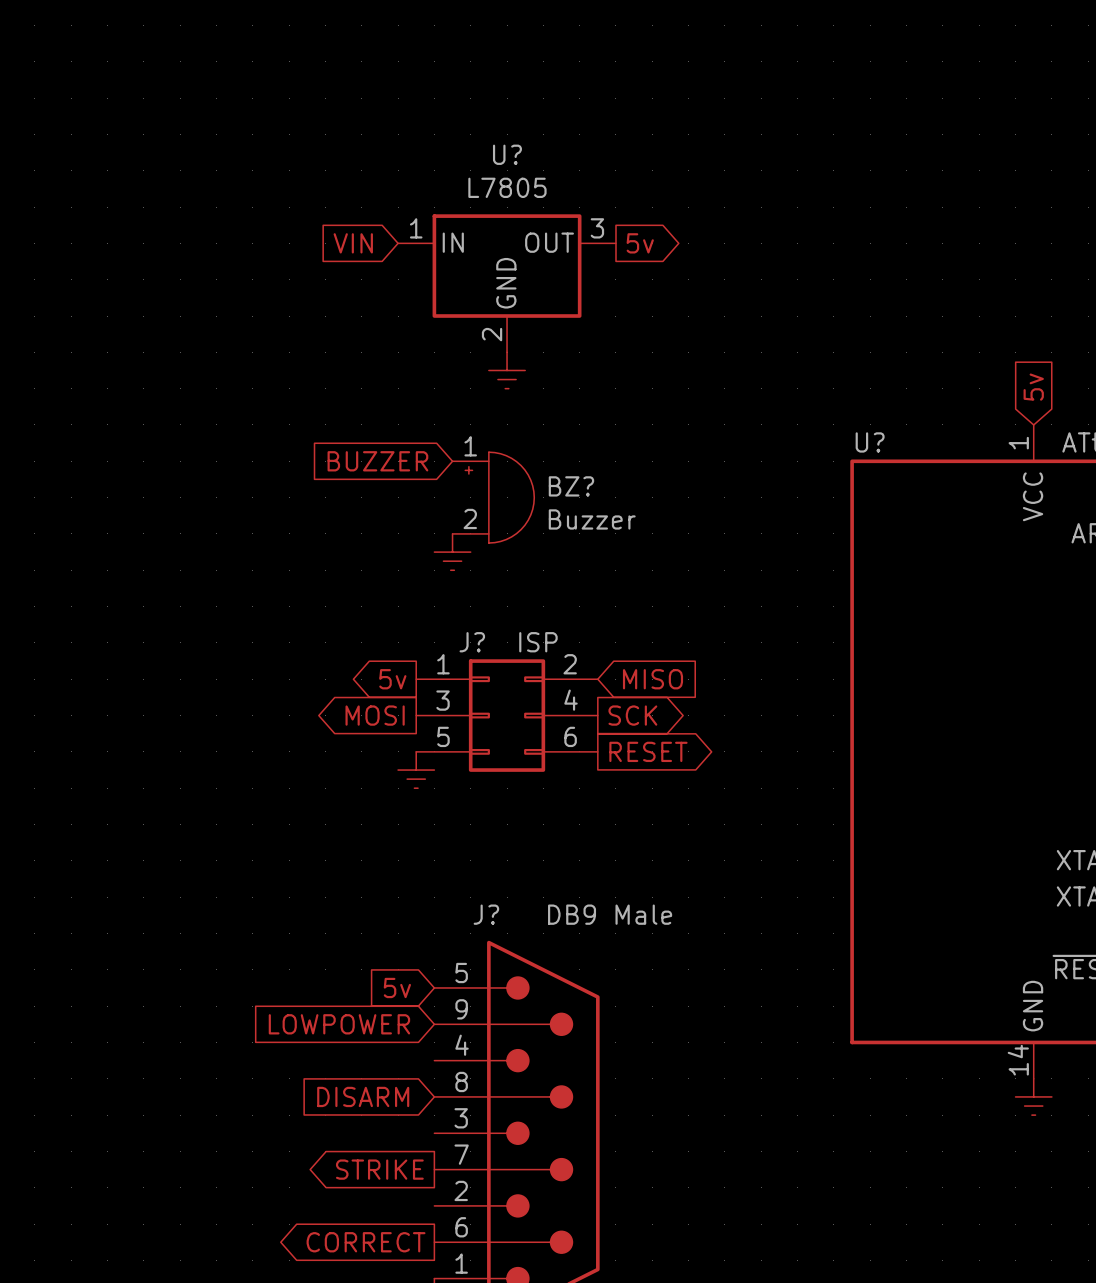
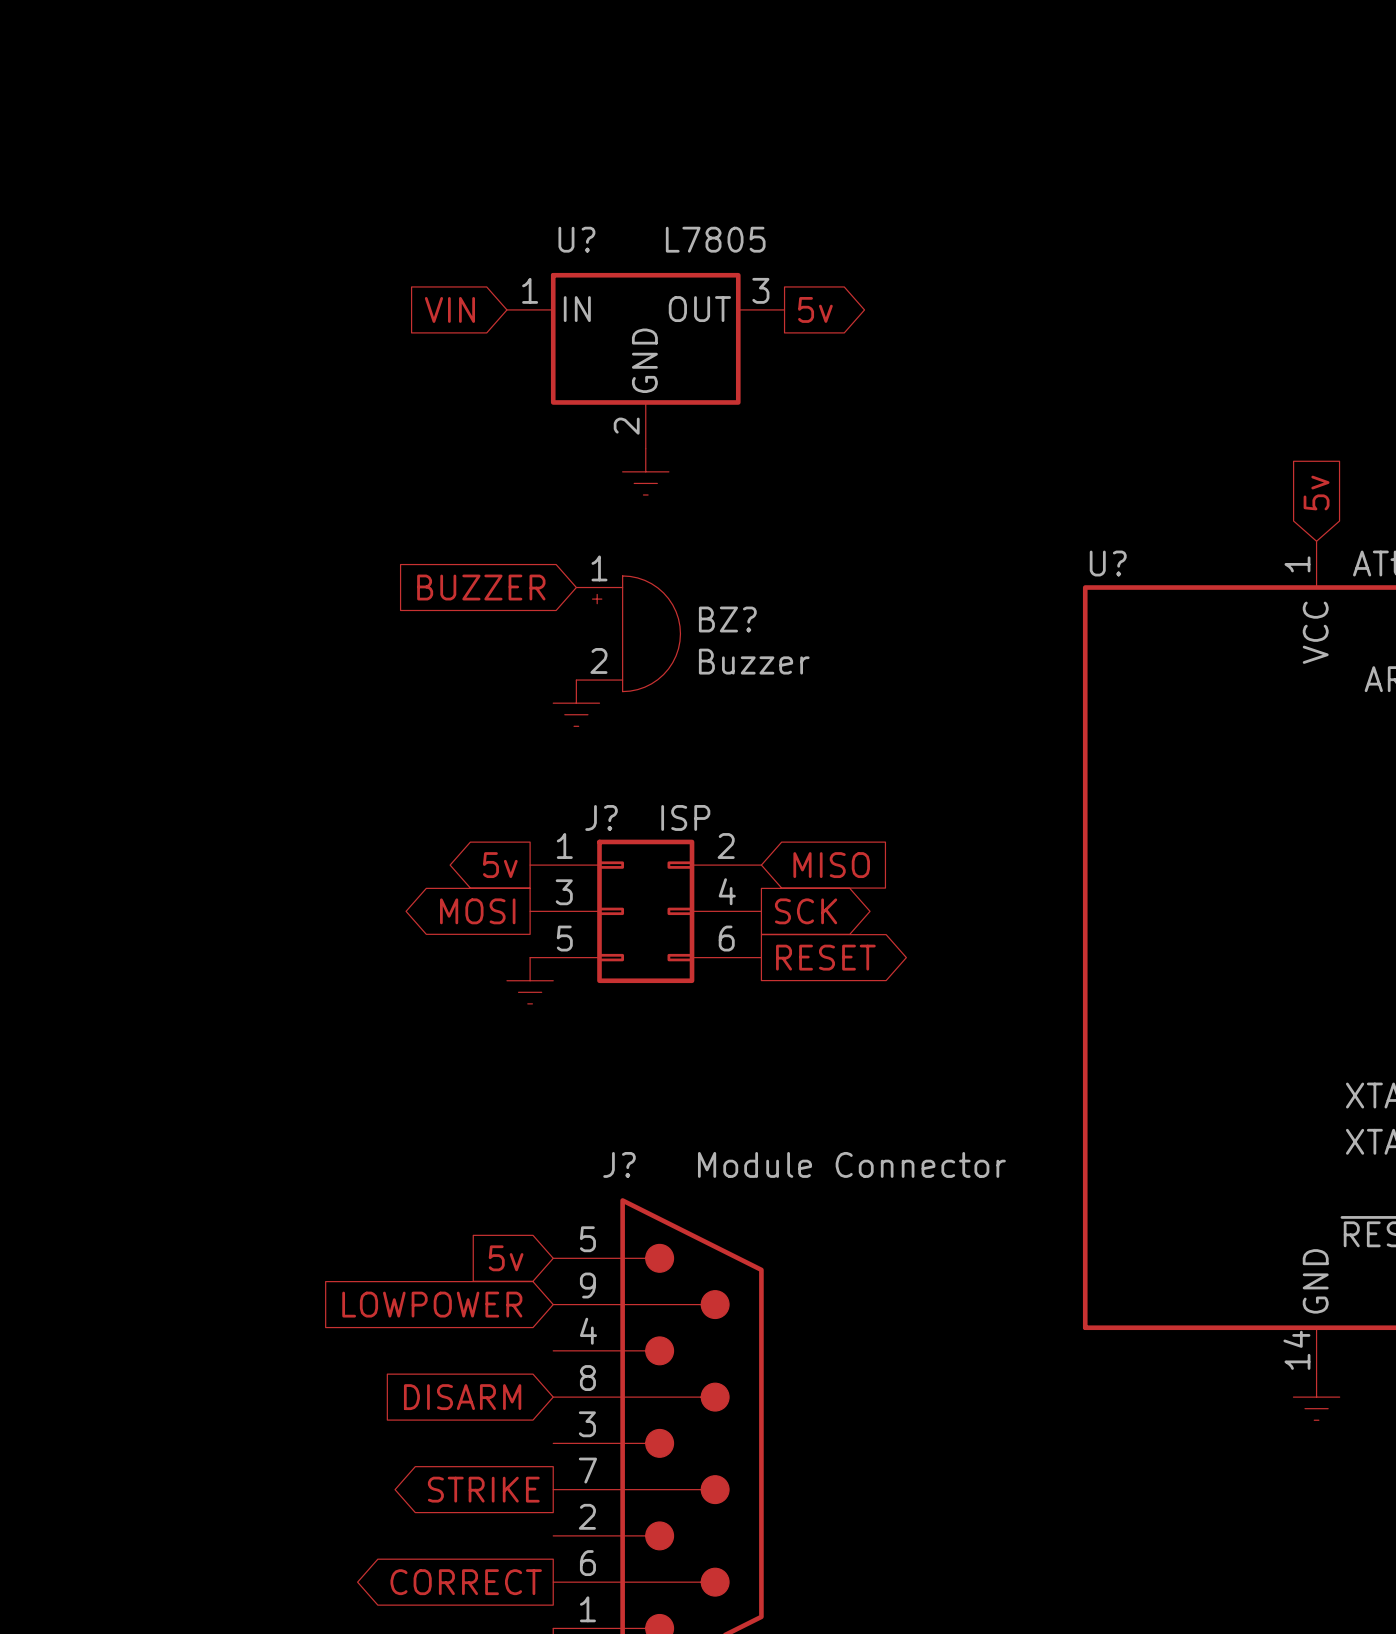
U? name position: U? (507, 154) -> U? (576, 239)
U? value position: L7805 (507, 187) -> L7805 (715, 239)
J? value: DB9 Male (610, 914) -> Module Connector (851, 1164)

